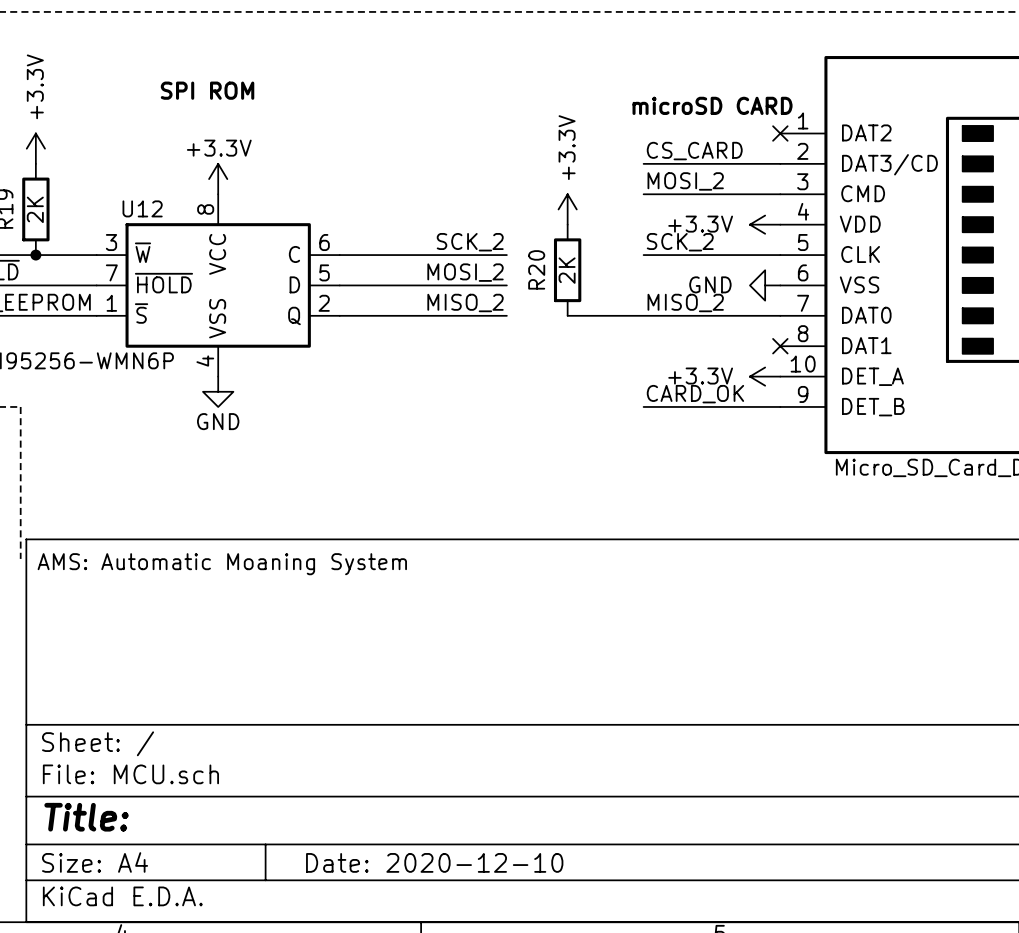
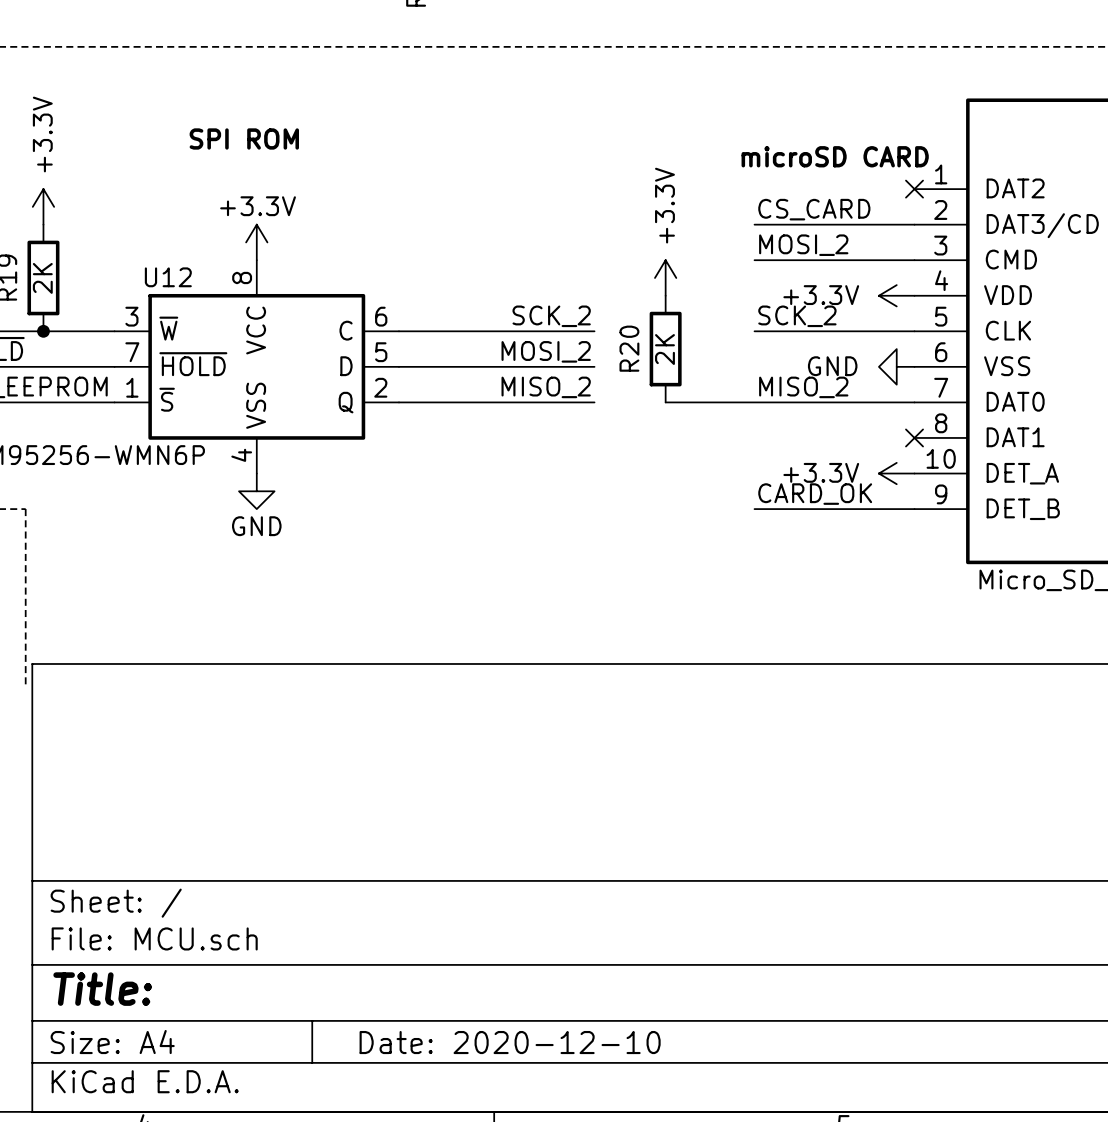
text: AMS: Automatic Moaning System (222, 564) -> none

